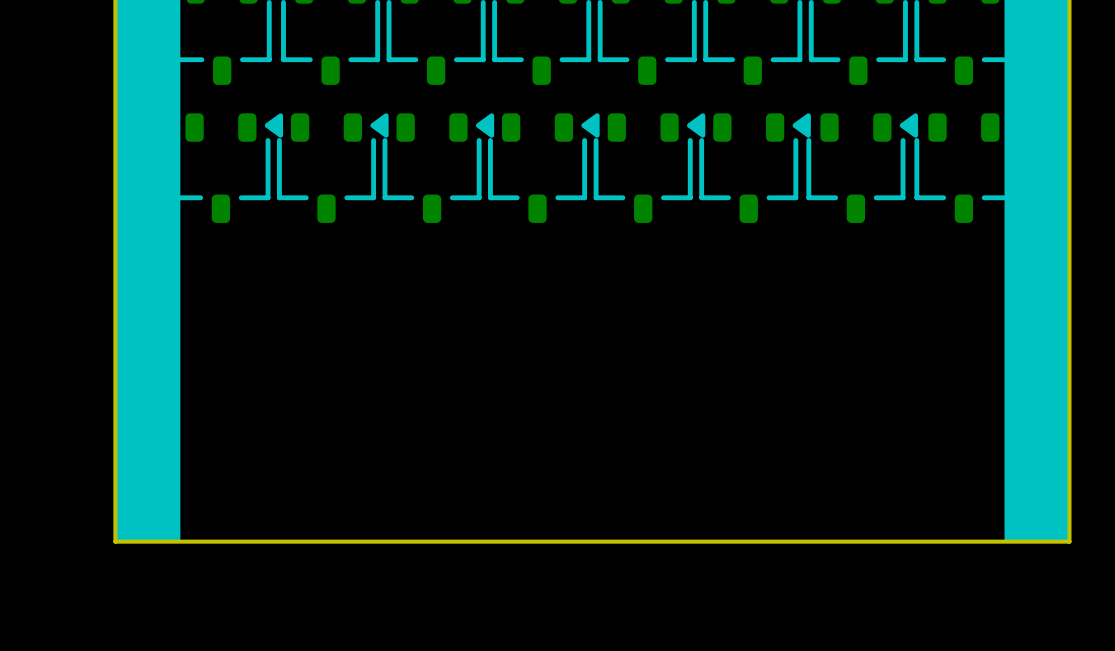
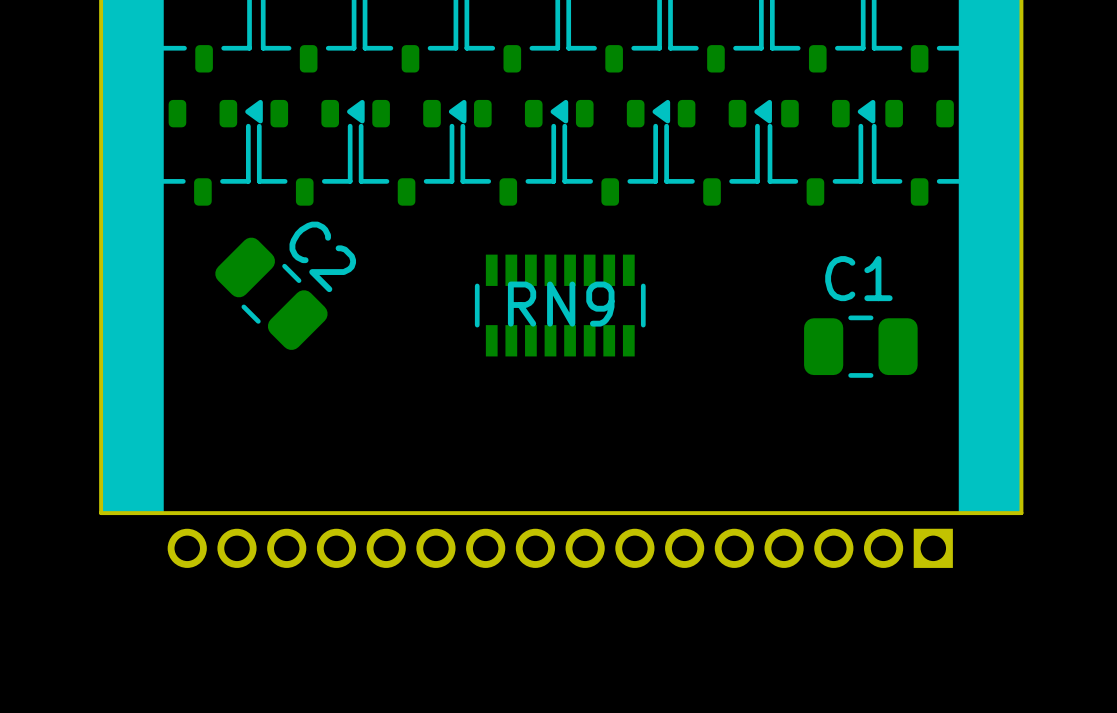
C2: none -> (271, 293)
RN9: none -> (560, 305)
C1: none -> (860, 346)
part: none -> (560, 548)

